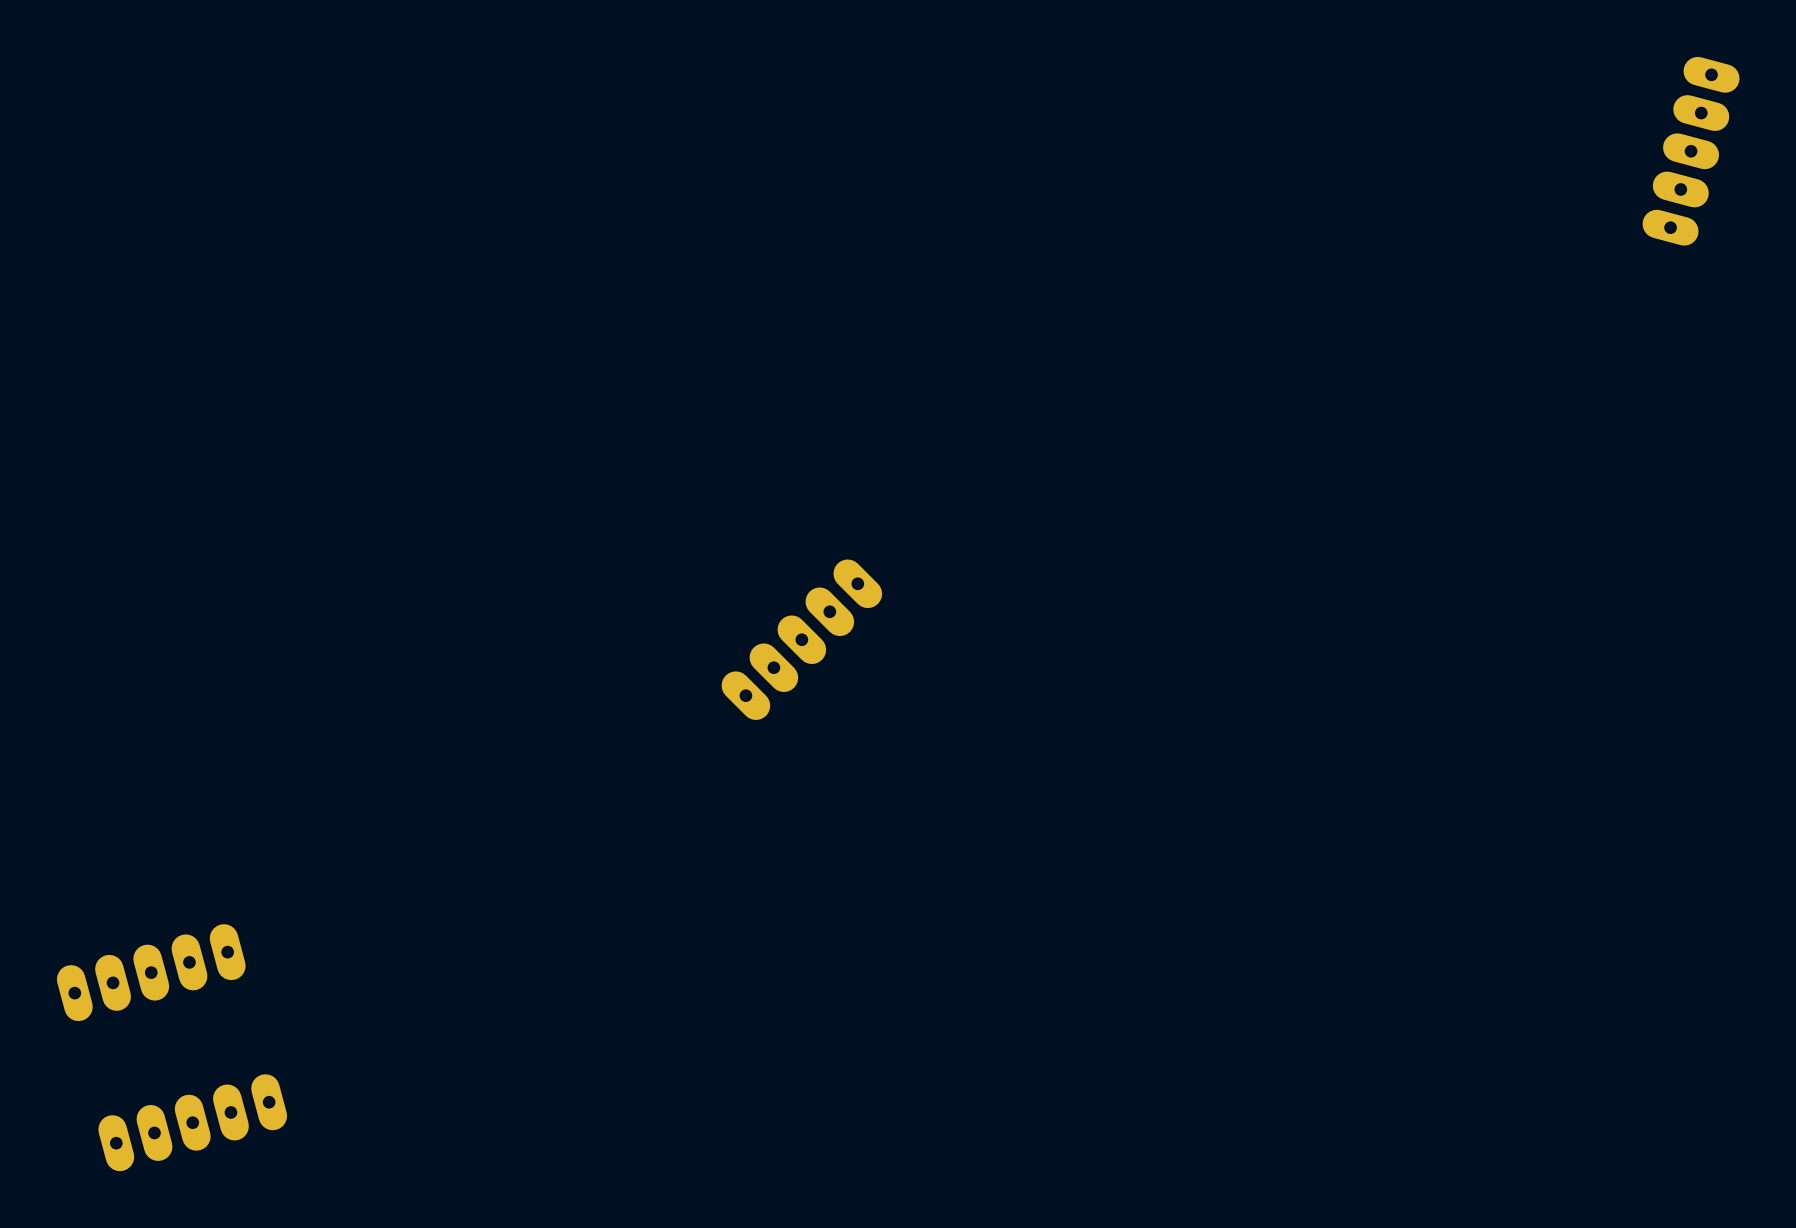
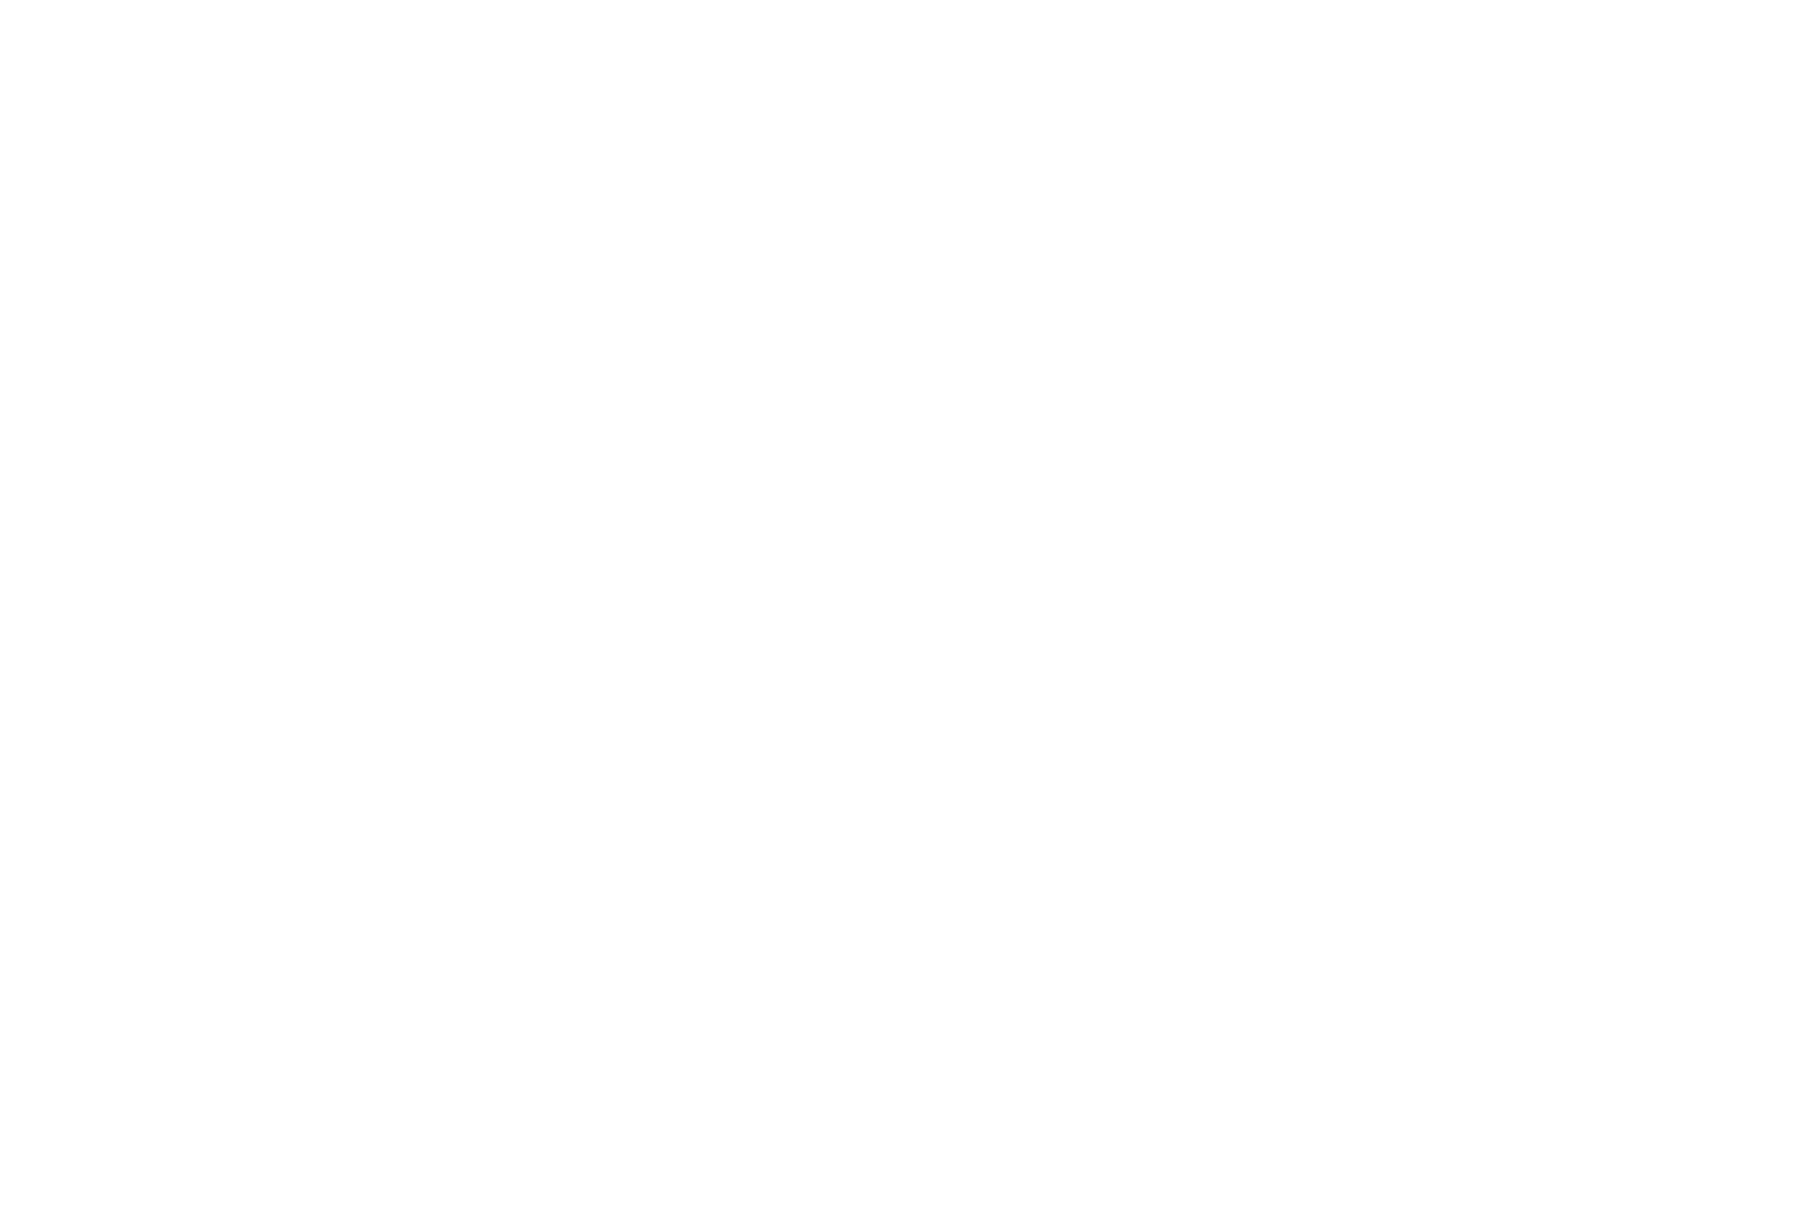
part: (1691, 151) -> none
part: (801, 639) -> none
part: (151, 972) -> none
part: (192, 1122) -> none

